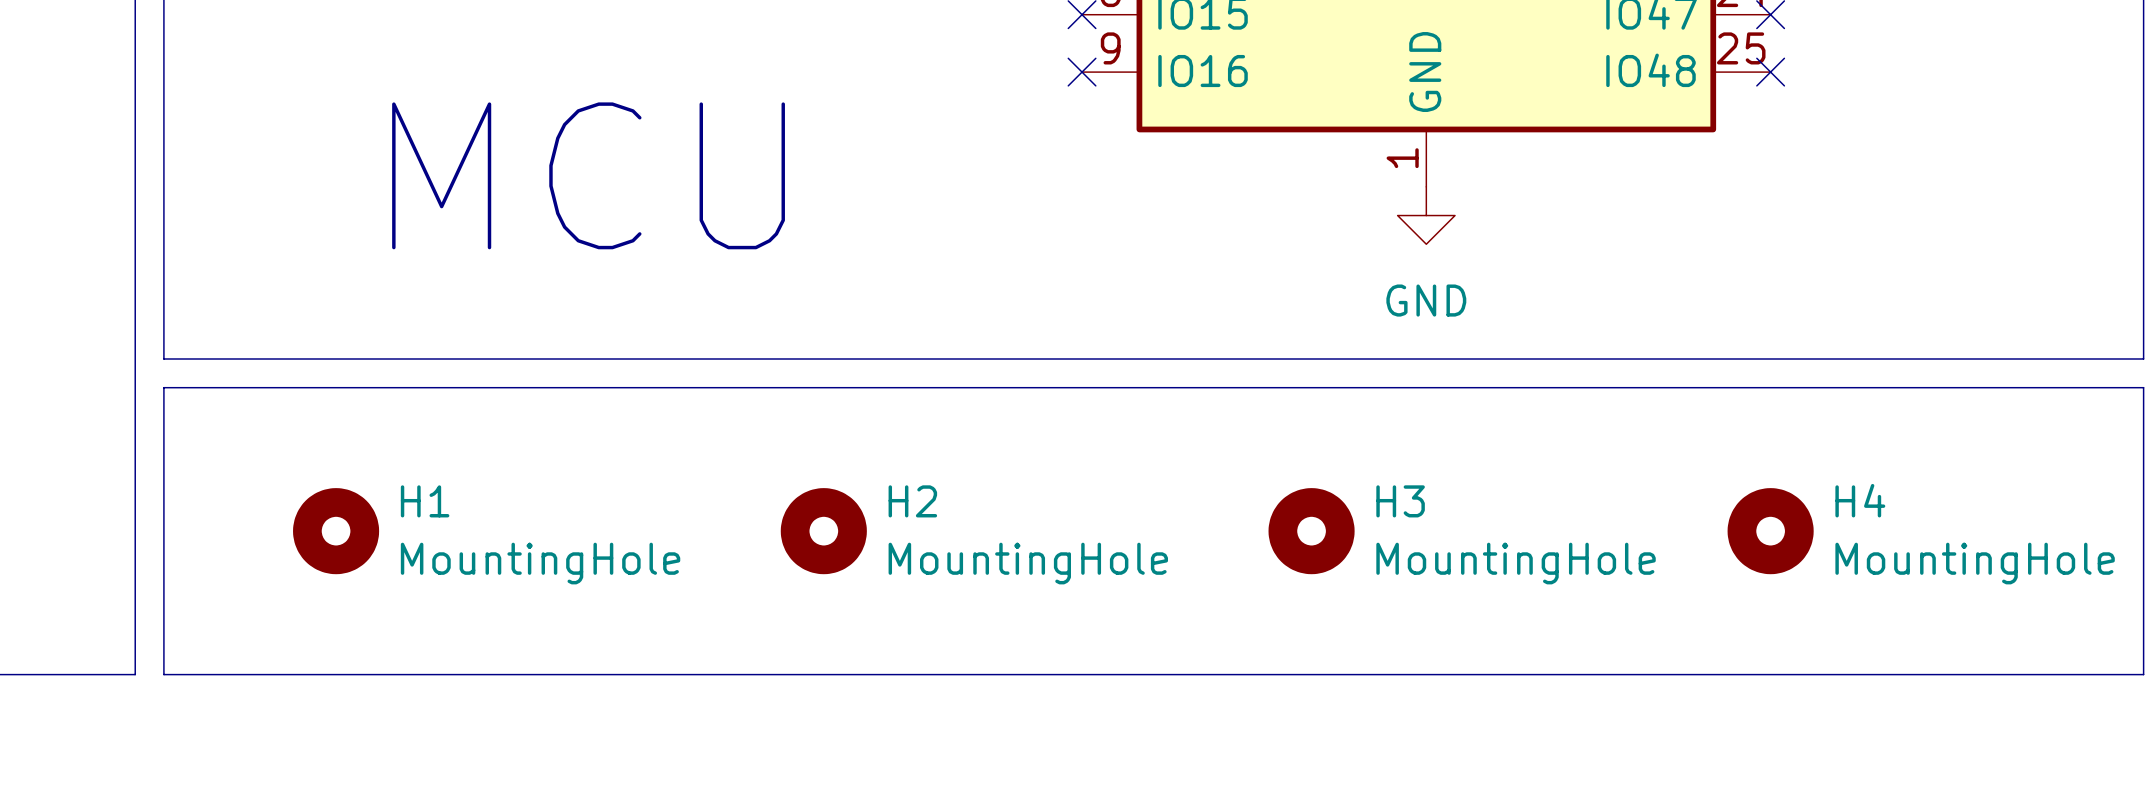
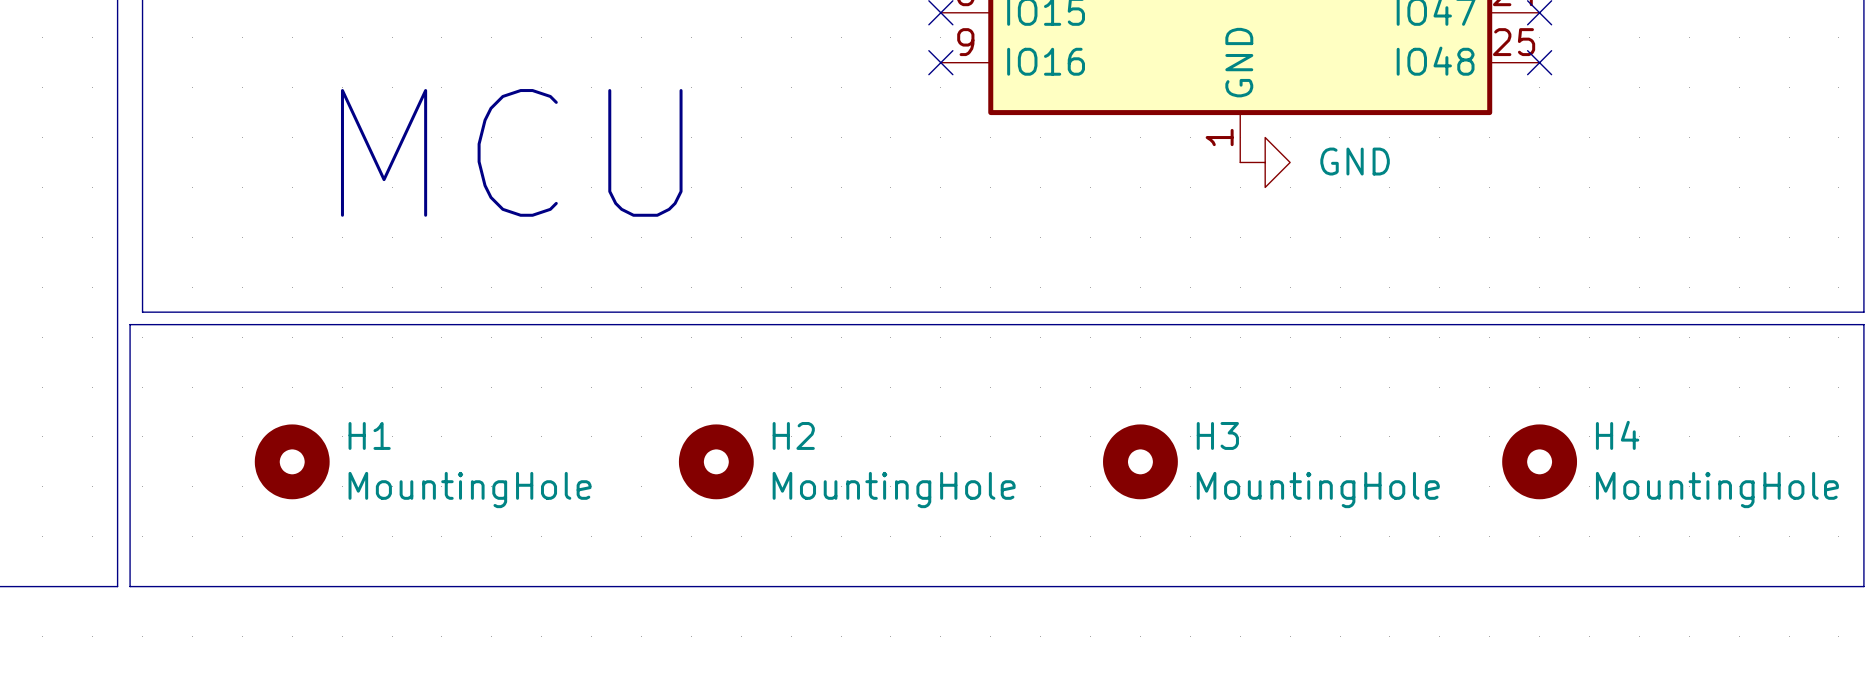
power symbol rotation: 0° (1426, 215) -> 90° counterclockwise (1265, 162)
power symbol position: GND (1426, 215) -> GND (1265, 162)
line: (2143, 387) (163, 387) (163, 674) -> (1863, 337) (1863, 324) (130, 324) (130, 586) (142, 586)

